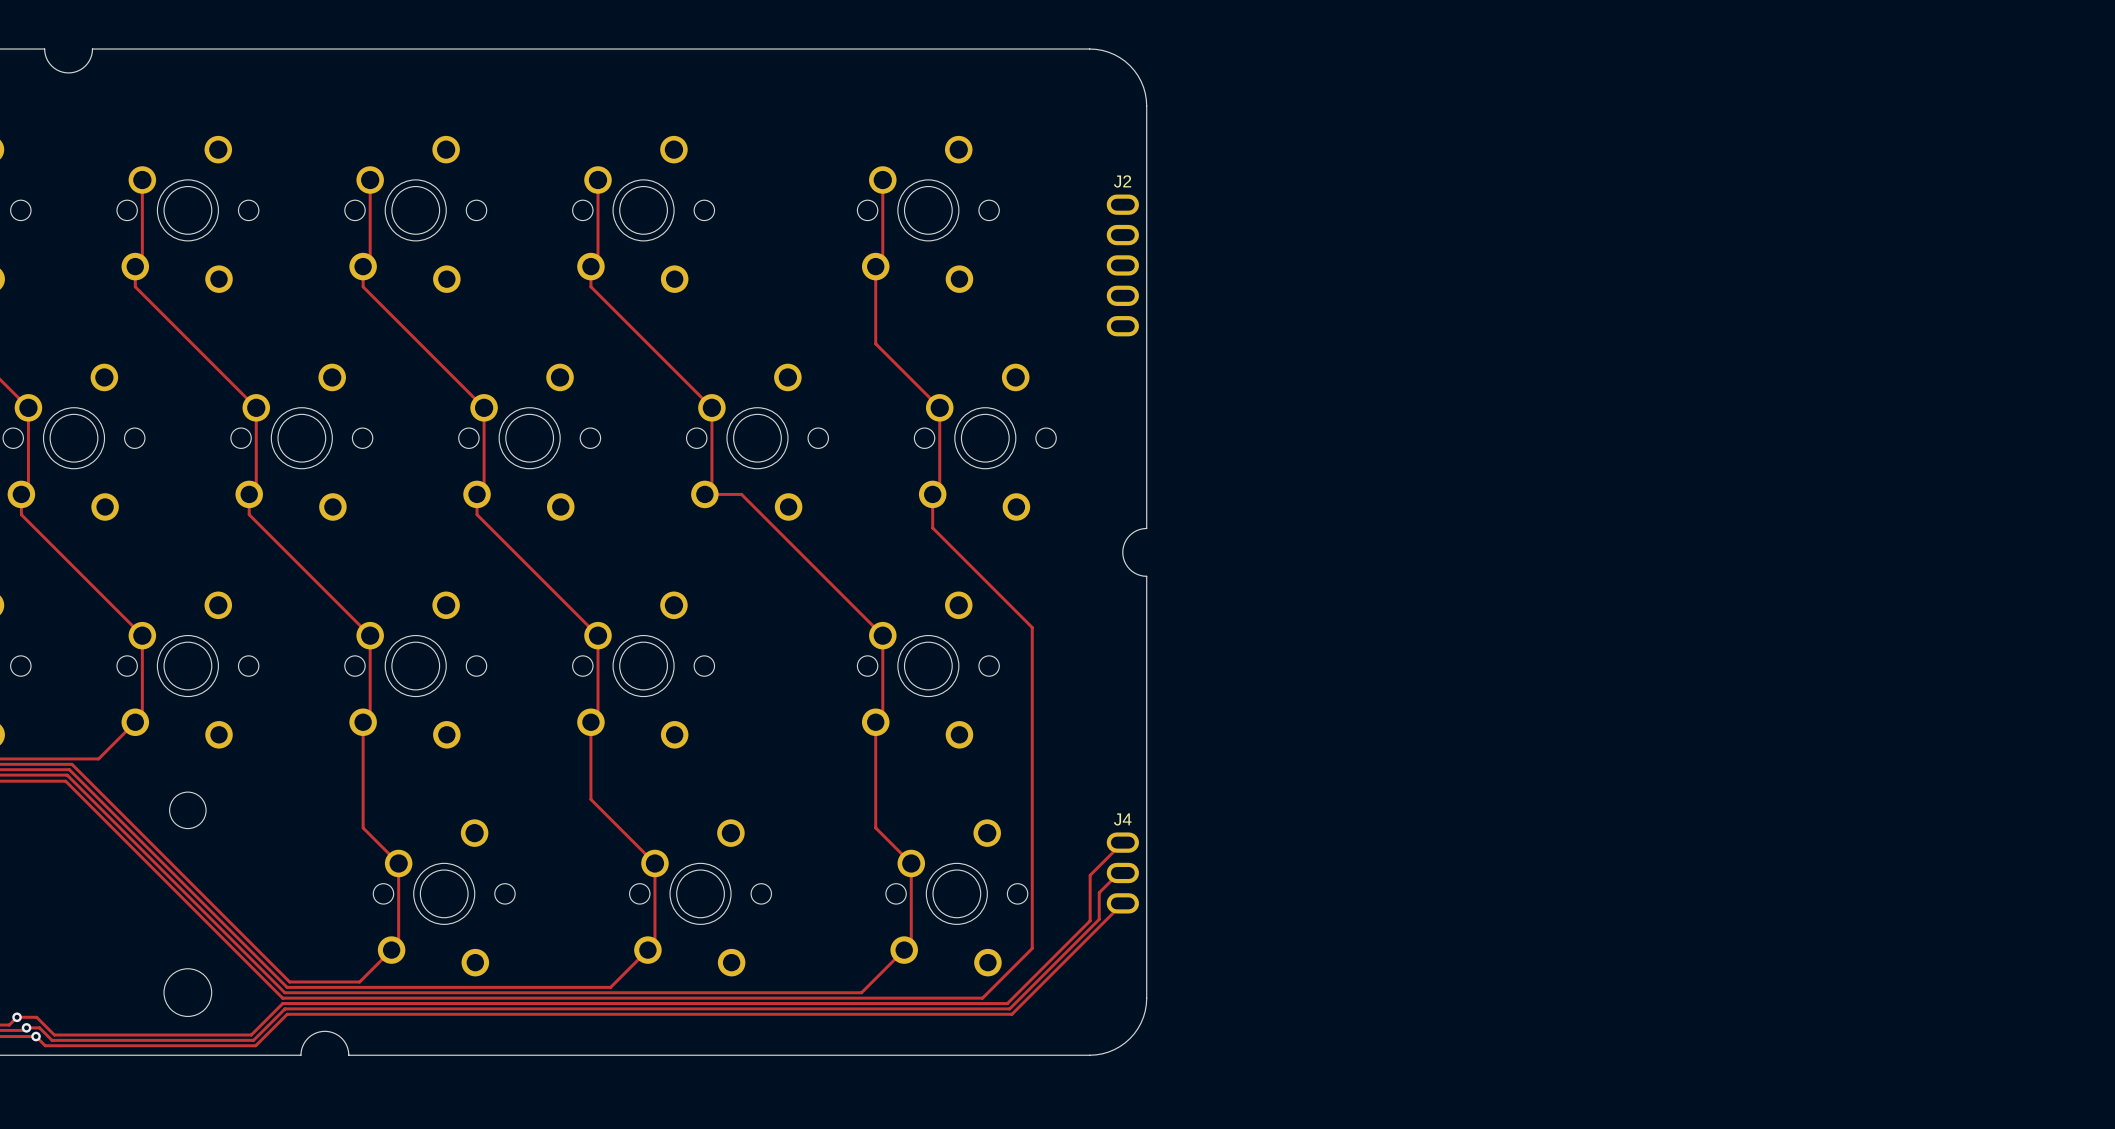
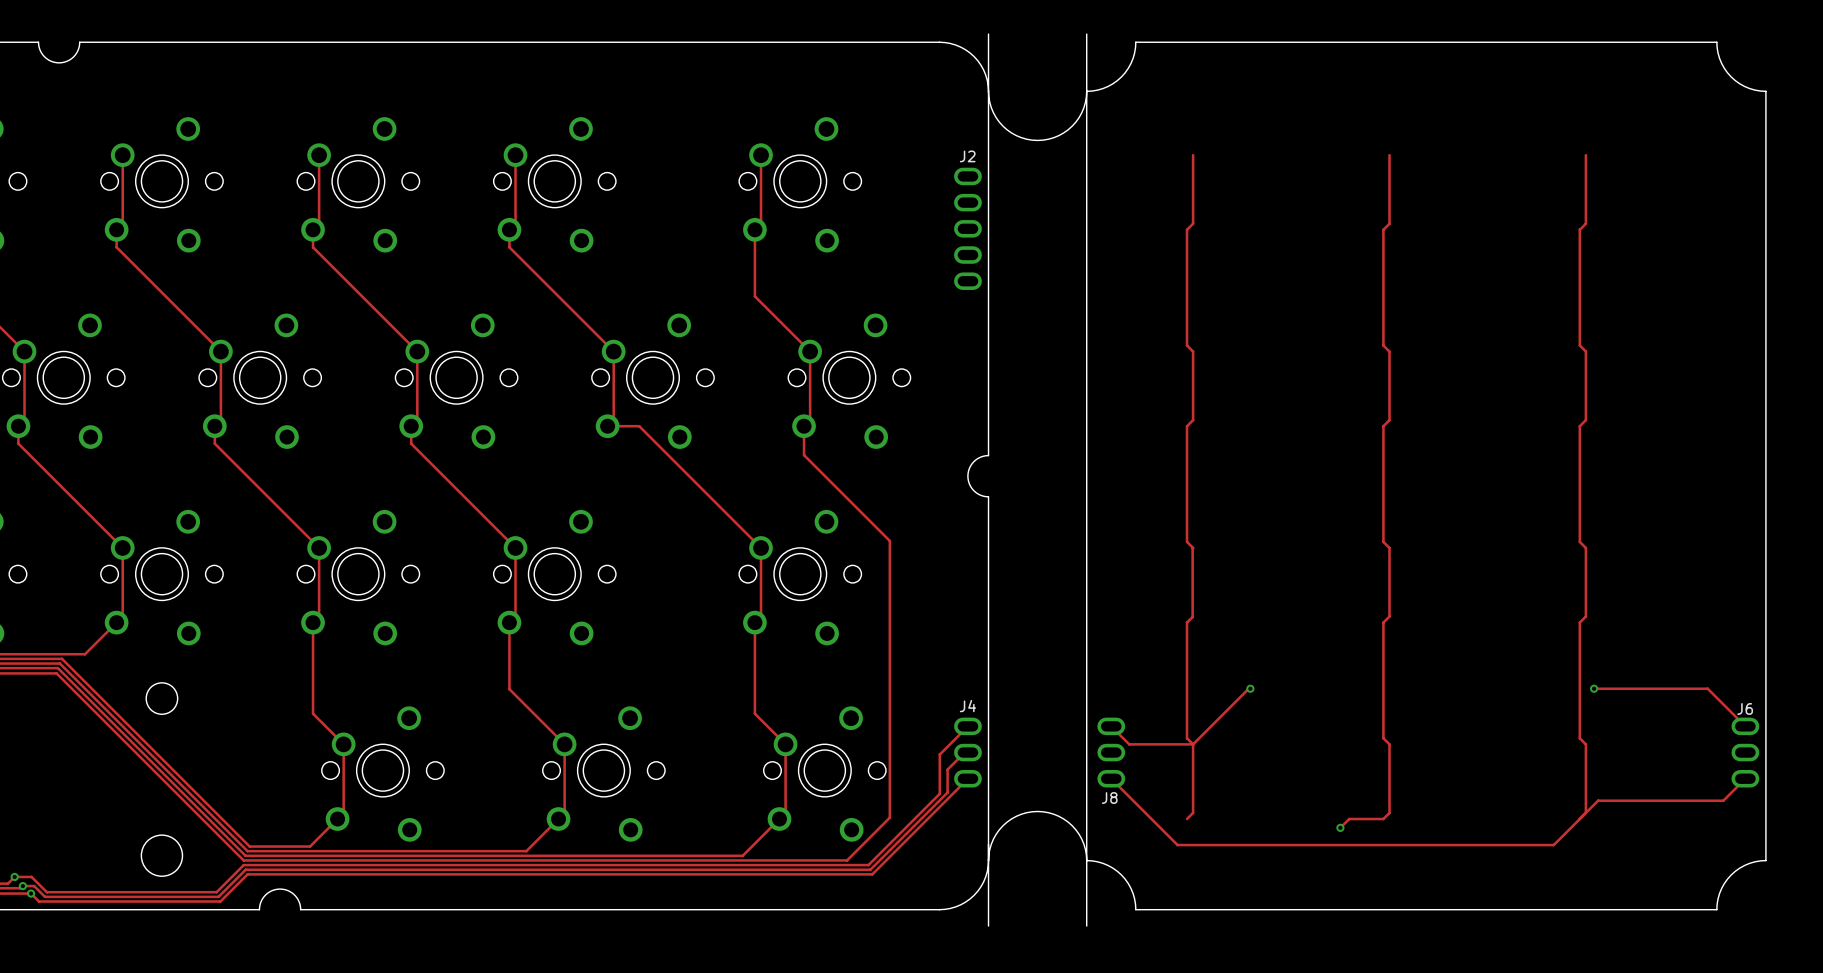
board edge: none -> (988, 34) (988, 91) (991, 107) (999, 121) (1007, 129) (1016, 135) (1032, 140) (1053, 137) (1072, 126) (1081, 112) (1086, 91) (1108, 86) (1125, 72) (1133, 58) (1135, 42) (1716, 42) (1719, 58) (1731, 76) (1749, 88) (1765, 91) (1765, 860) (1744, 865) (1731, 874) (1719, 893) (1716, 909) (1135, 909) (1133, 893) (1125, 879) (1108, 865) (1086, 860) (1081, 839) (1072, 825) (1053, 814) (1032, 811) (1016, 816) (1007, 822) (996, 834) (991, 844) (988, 860) (988, 926)
board edge: none -> (1086, 34) (1086, 926)
track: none -> (1193, 155) (1193, 223) (1187, 229) (1187, 345) (1193, 351) (1193, 420) (1187, 426) (1187, 541) (1193, 547) (1192, 616) (1187, 622) (1187, 738) (1193, 744)
track: none -> (1389, 155) (1389, 223) (1383, 229) (1383, 345) (1389, 351) (1389, 420) (1383, 426) (1383, 541) (1389, 547) (1389, 616) (1383, 622) (1383, 738) (1389, 744) (1389, 812) (1383, 819) (1349, 819) (1340, 827)
track: none -> (1585, 155) (1585, 223) (1579, 229) (1579, 345) (1585, 351) (1585, 420) (1579, 426) (1579, 541) (1585, 547) (1585, 616) (1579, 622) (1579, 738) (1585, 744) (1585, 812)
track: none -> (1250, 688) (1193, 744)
via: none -> (1250, 688)
track: none -> (1594, 688) (1707, 688) (1745, 726)
via: none -> (1594, 688)
track: none -> (1111, 726) (1129, 744) (1193, 744)
track: none -> (1193, 744) (1193, 812) (1187, 819)
J8: none -> (1111, 752)
J6: none -> (1745, 752)
track: none -> (1111, 778) (1177, 845) (1553, 845) (1598, 800) (1723, 800) (1745, 778)
via: none -> (1340, 827)

